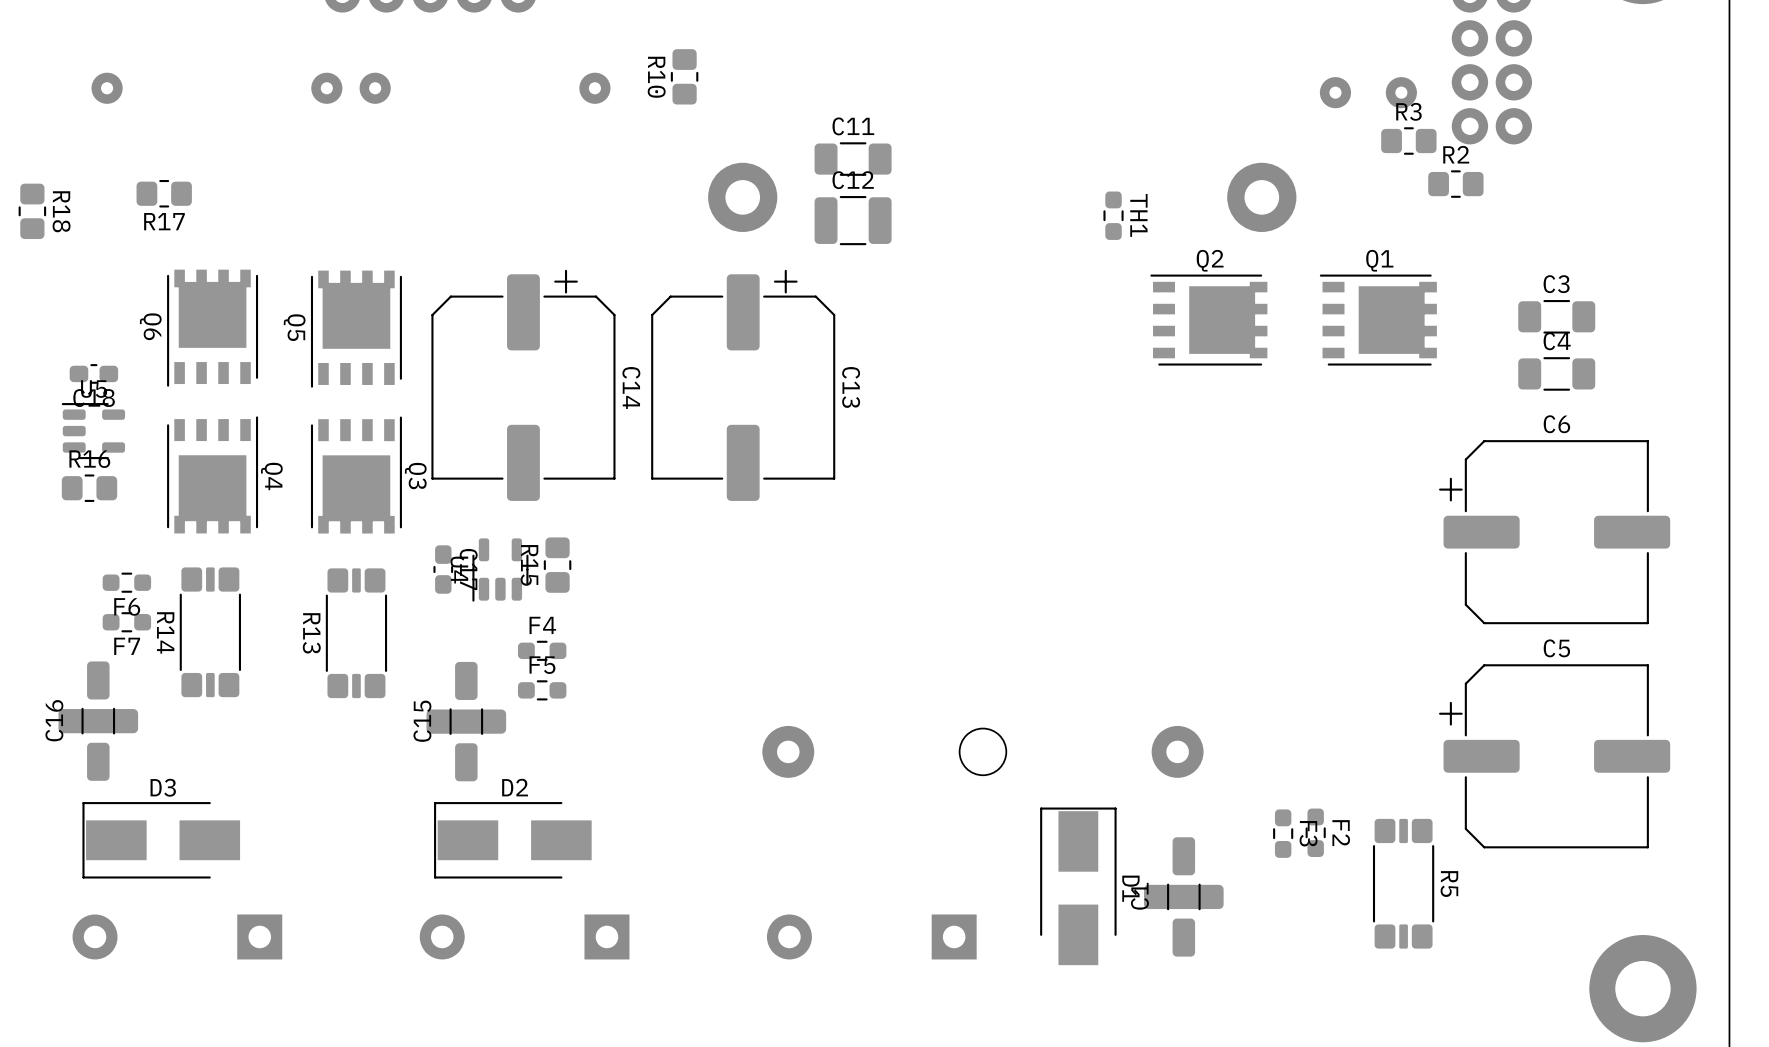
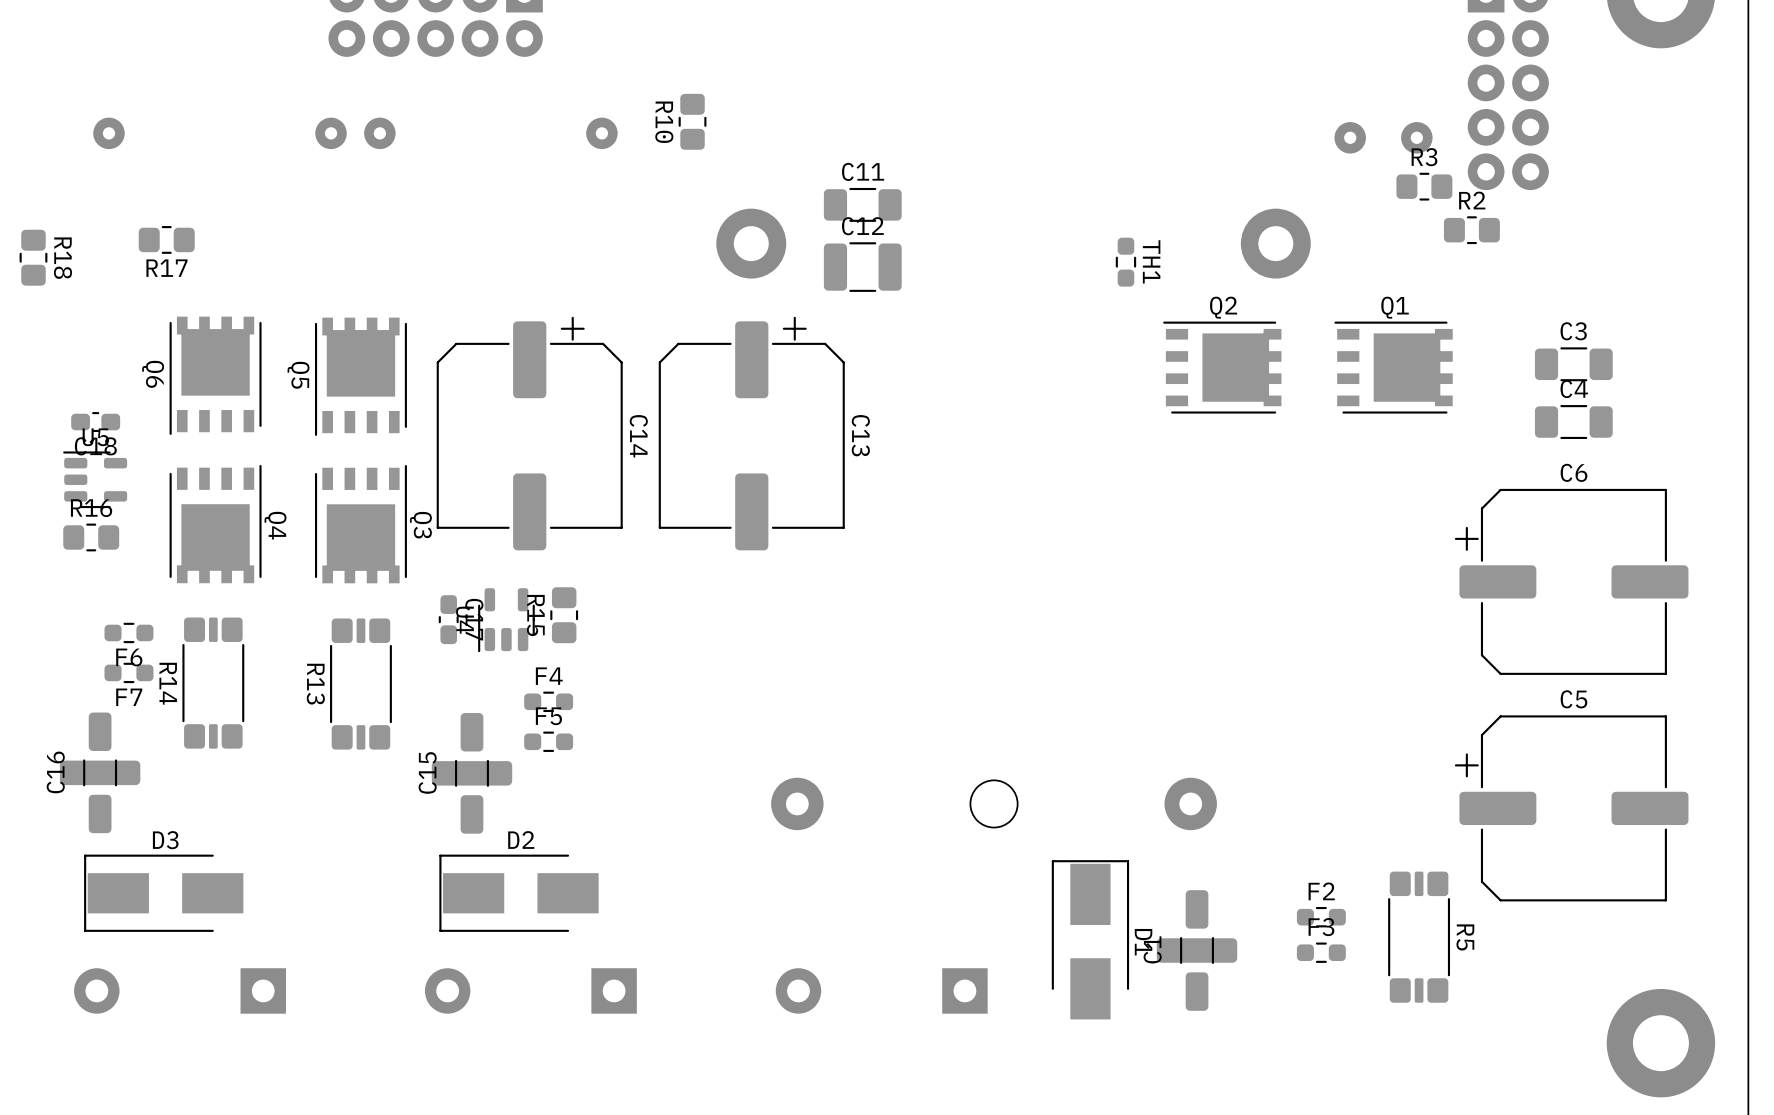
F2 rotation: 0° (1315, 832) -> 90° clockwise (1321, 917)
F2 position: (1315, 832) -> (1321, 917)
F3 rotation: 0° (1283, 833) -> 90° clockwise (1321, 952)
F3 position: (1283, 833) -> (1321, 952)
F3 name position: F3 (1308, 833) -> F3 (1321, 927)
F2 name position: F2 (1341, 833) -> F2 (1321, 891)

